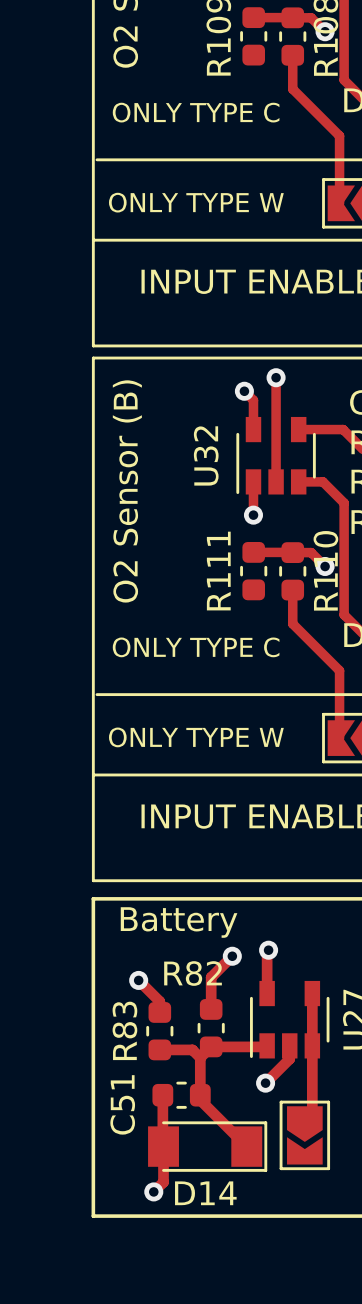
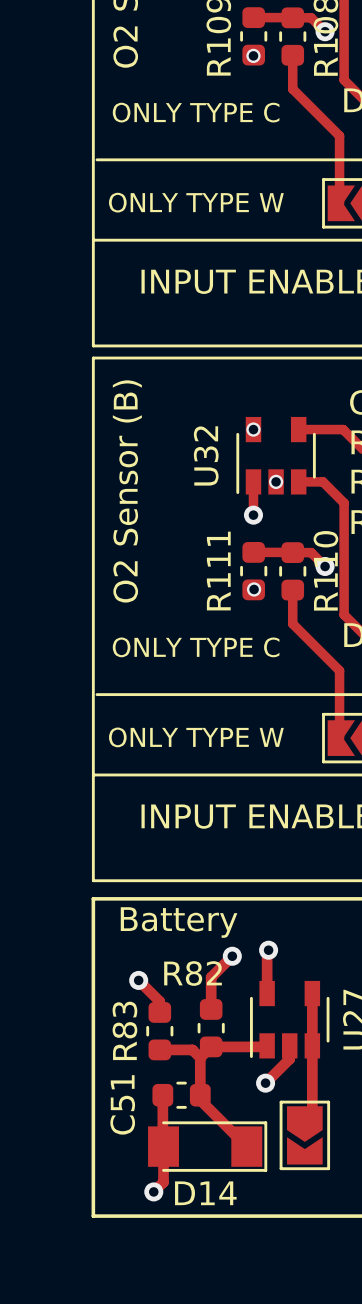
via: none -> (253, 55)
track: (276, 377) (276, 481) -> none
via: (276, 377) -> none
track: (244, 391) (253, 400) (253, 429) -> none
via: (244, 391) -> none
via: none -> (253, 429)
via: none -> (276, 481)
via: none -> (254, 589)

